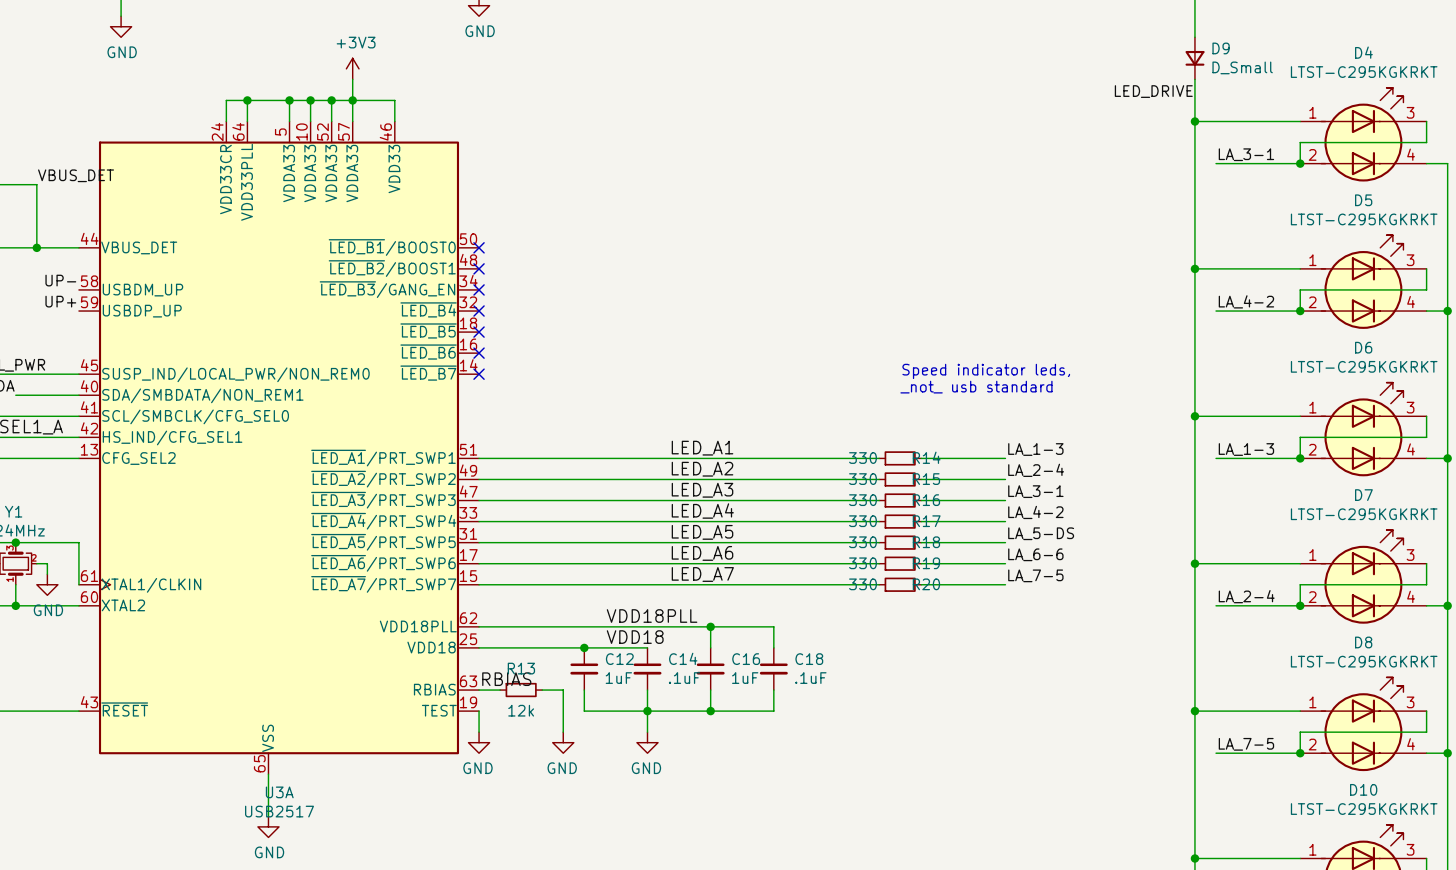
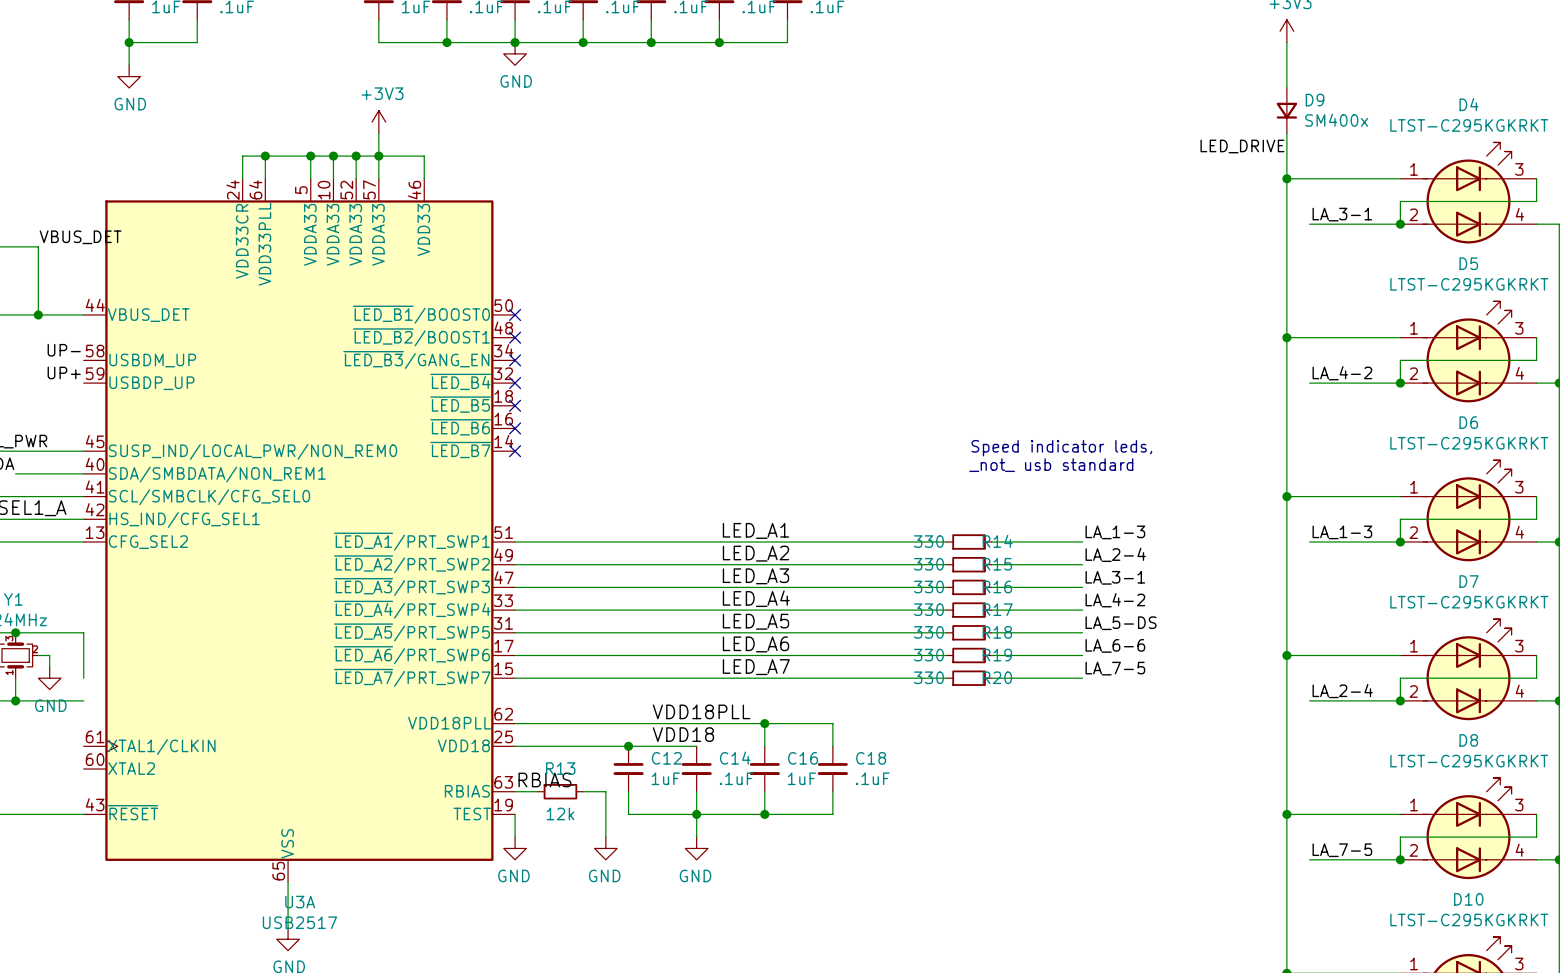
D9 value: D_Small (1242, 67) -> SM400x (1336, 120)
U3A symbol: [78, 121, 480, 775] -> [83, 178, 516, 883]

